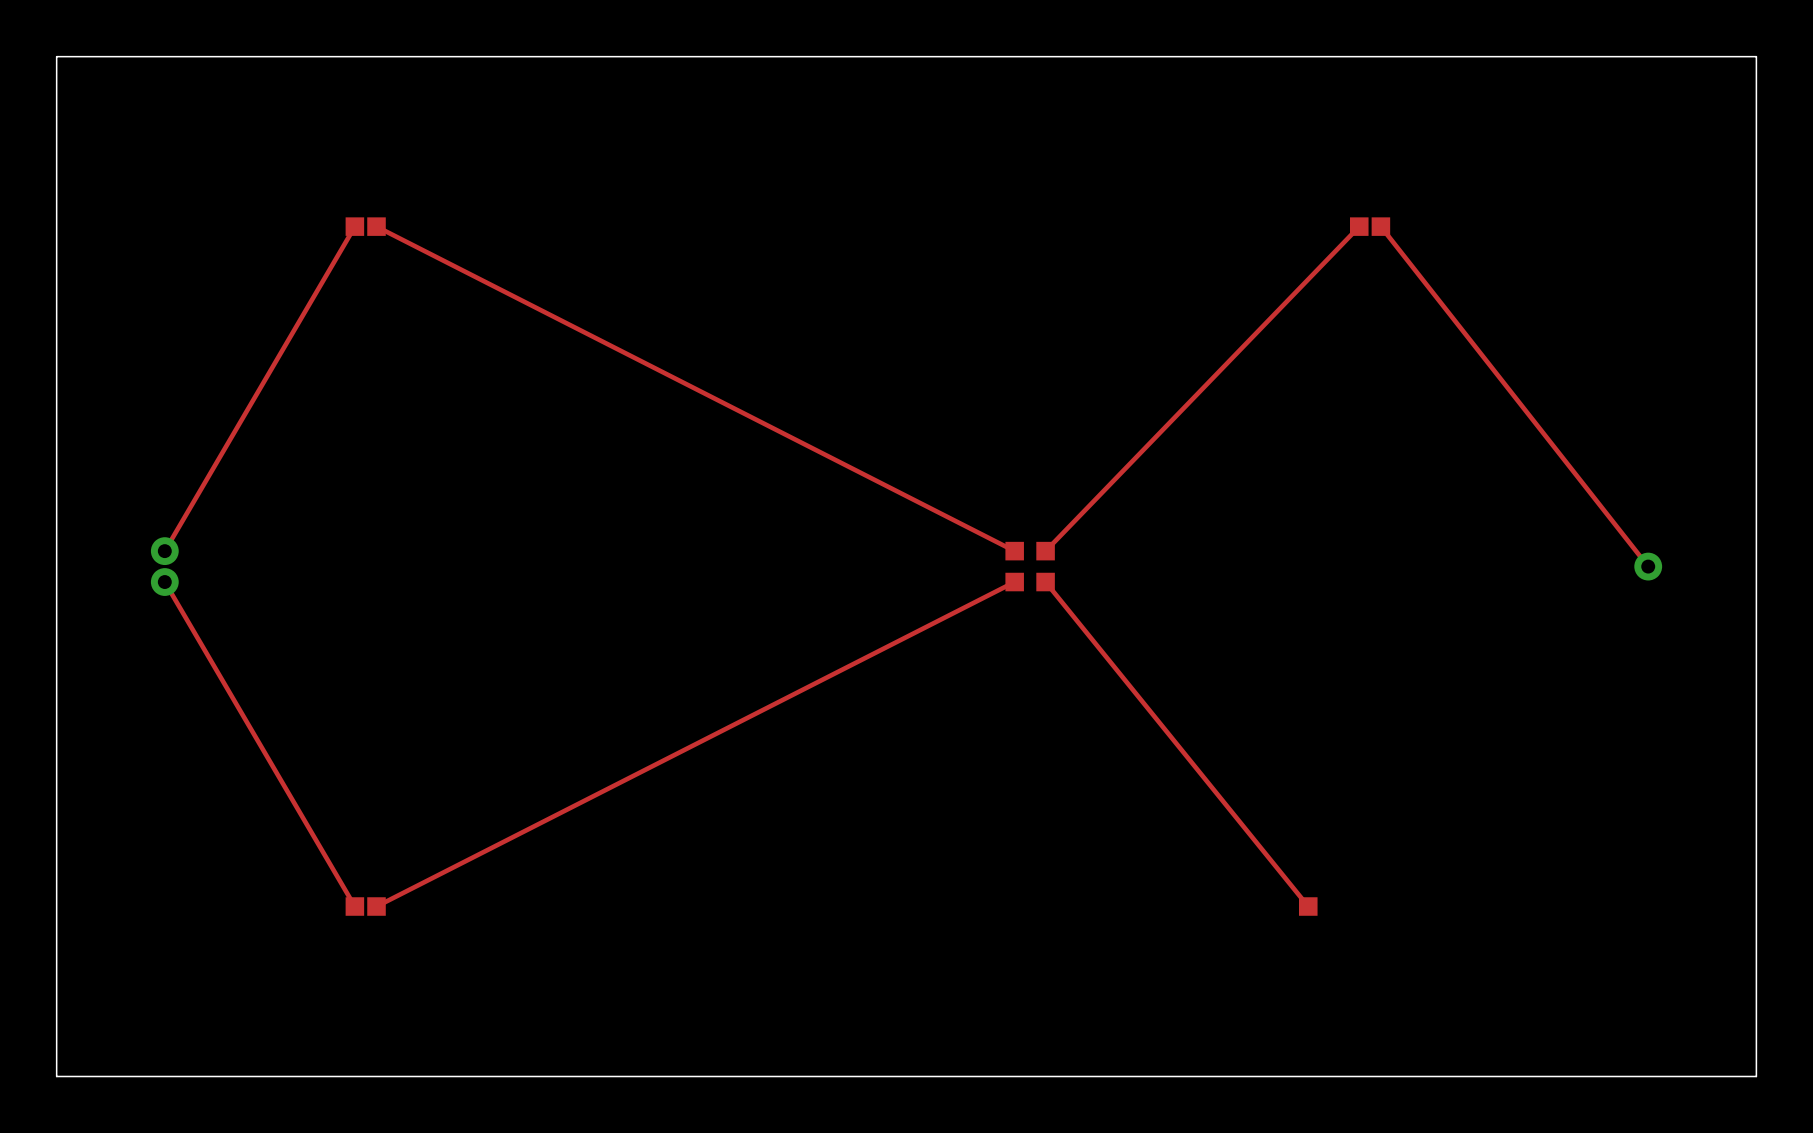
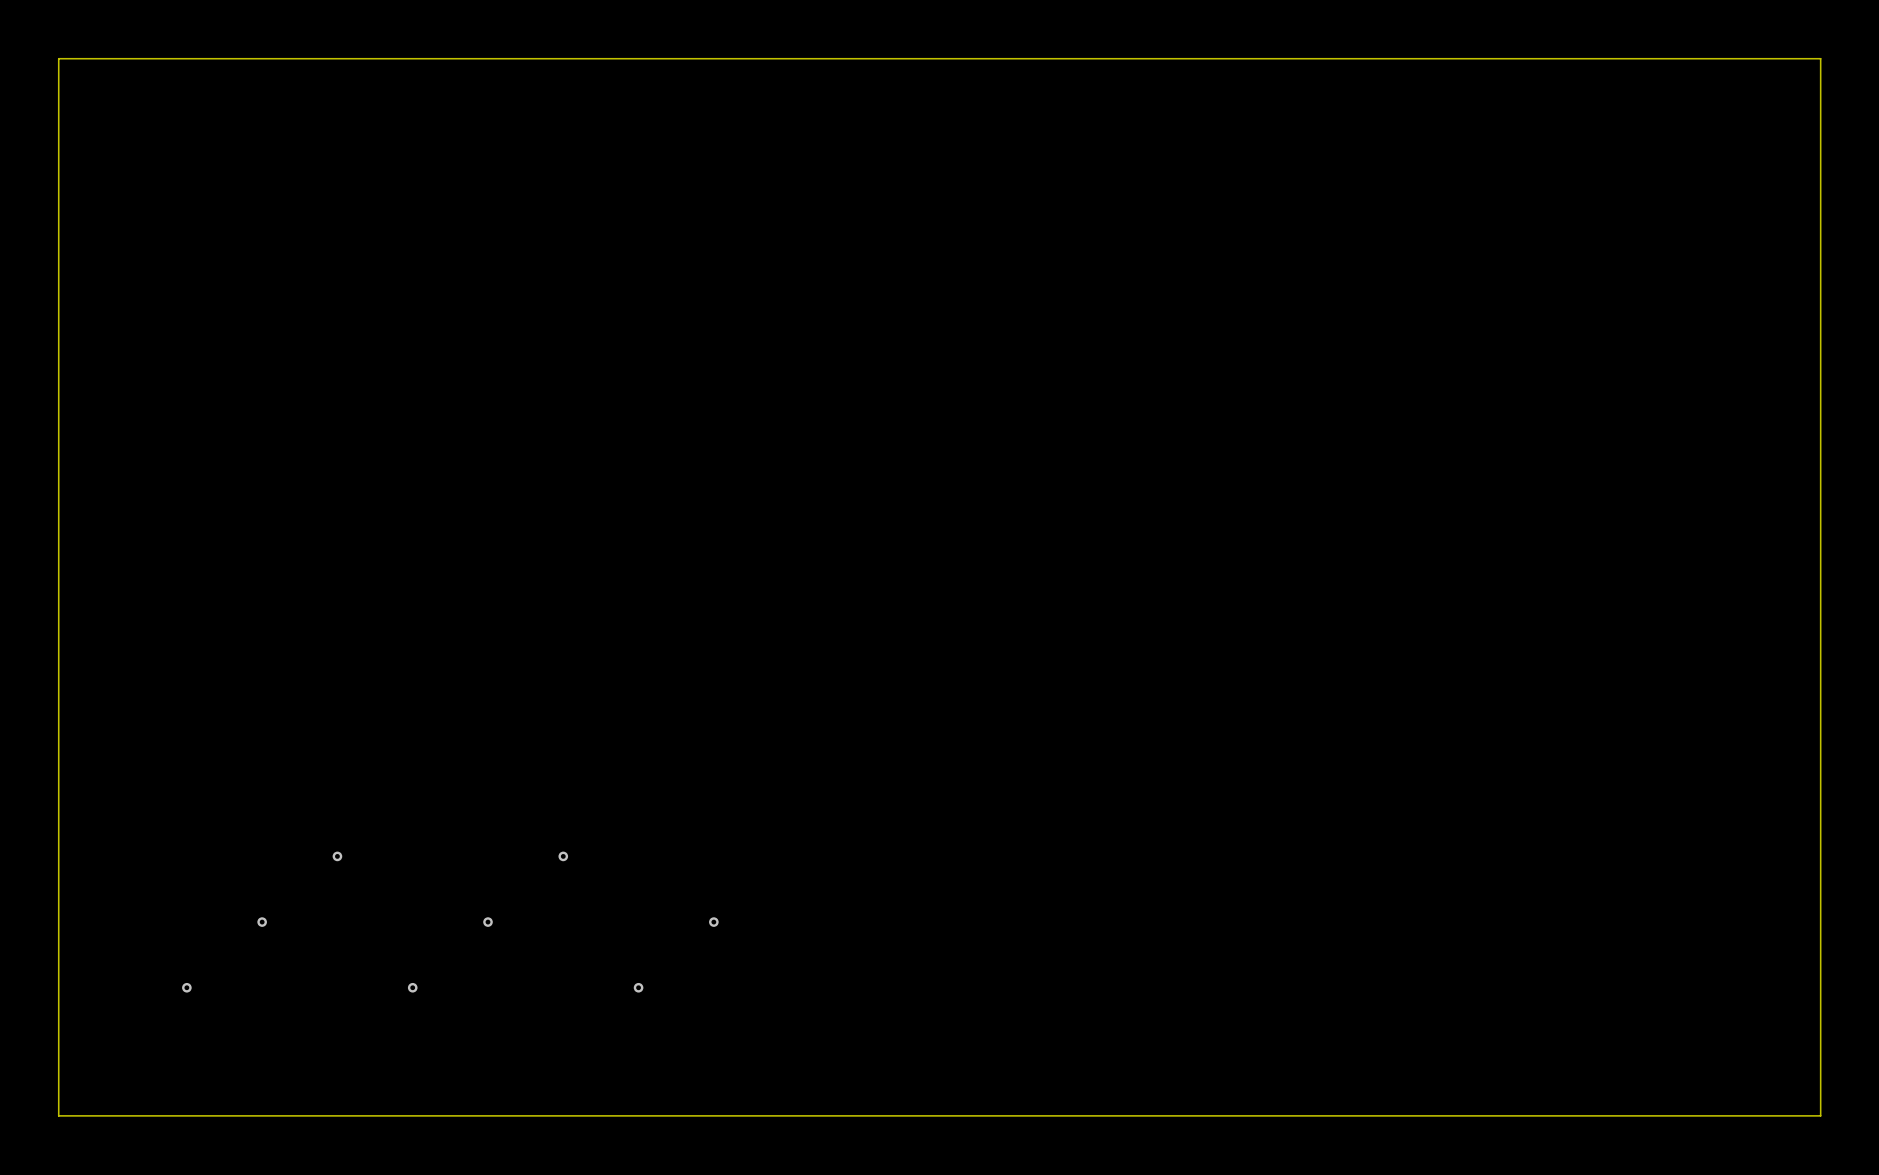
top track: (354, 226) (164, 551) -> none
part: (365, 226) -> none
top track: (376, 226) (1014, 551) -> none
top track: (1359, 226) (1045, 551) -> none
part: (1370, 226) -> none
top track: (1380, 226) (1648, 566) -> none
part: (164, 566) -> none
part: (1030, 566) -> none
part: (1648, 566) -> none
top track: (164, 582) (354, 906) -> none
top track: (1014, 582) (376, 906) -> none
top track: (1045, 582) (1308, 906) -> none
via: none -> (337, 856)
via: none -> (563, 856)
via: none -> (262, 922)
via: none -> (488, 922)
via: none -> (713, 922)
part: (365, 906) -> none
part: (1308, 906) -> none
via: none -> (186, 987)
via: none -> (412, 987)
via: none -> (638, 987)

